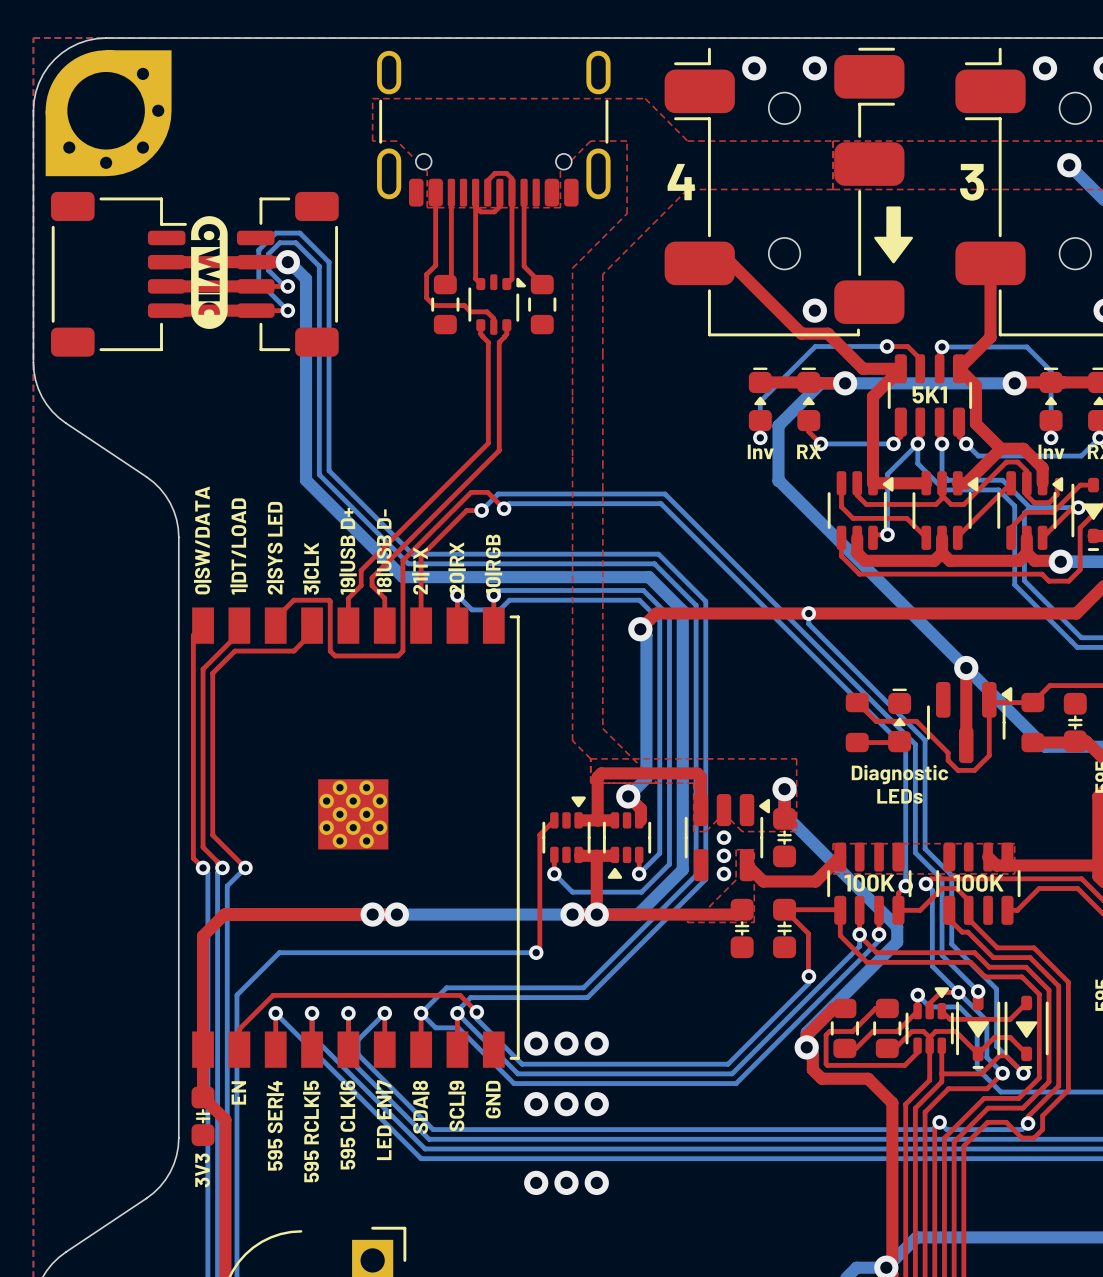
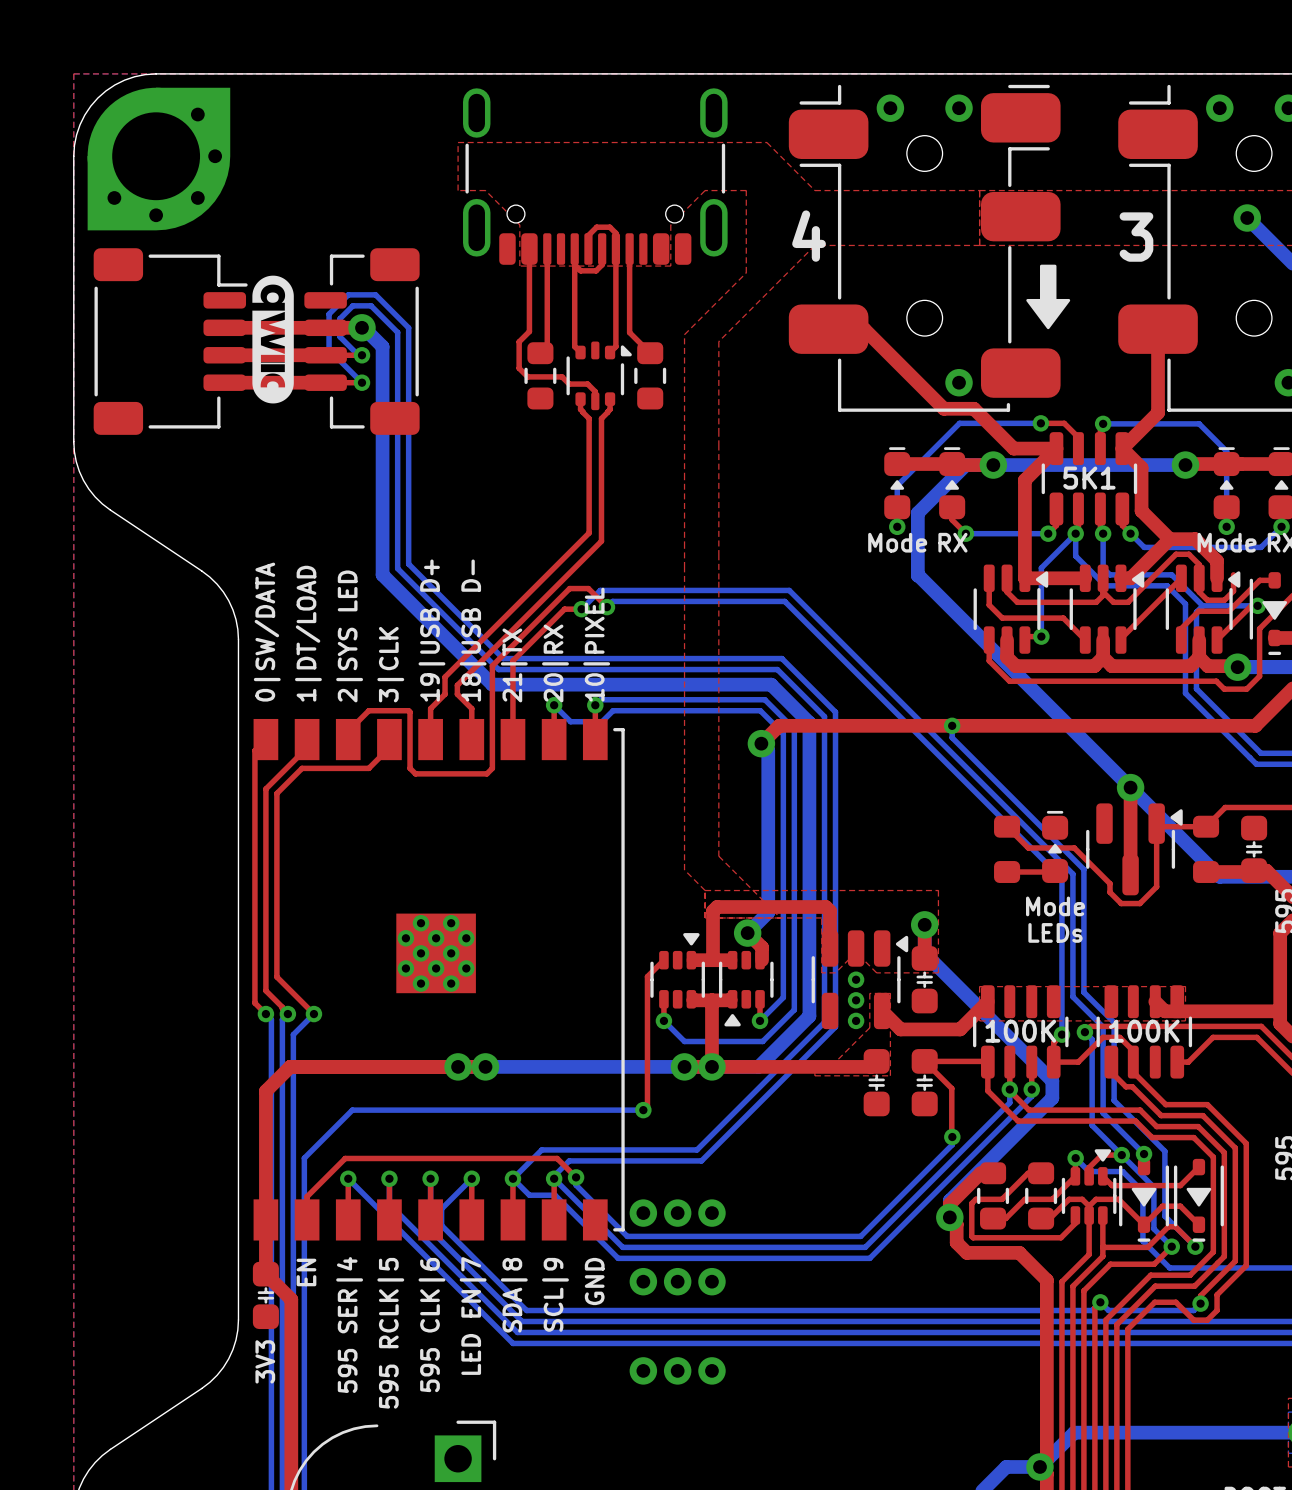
text: Inv (760, 451) -> Mode (897, 542)
text: Inv (1051, 451) -> Mode (1227, 542)
text: 10|RGB (493, 564) -> 10|PIXEL (596, 644)
text: Diagnostic (899, 774) -> Mode (1055, 906)

